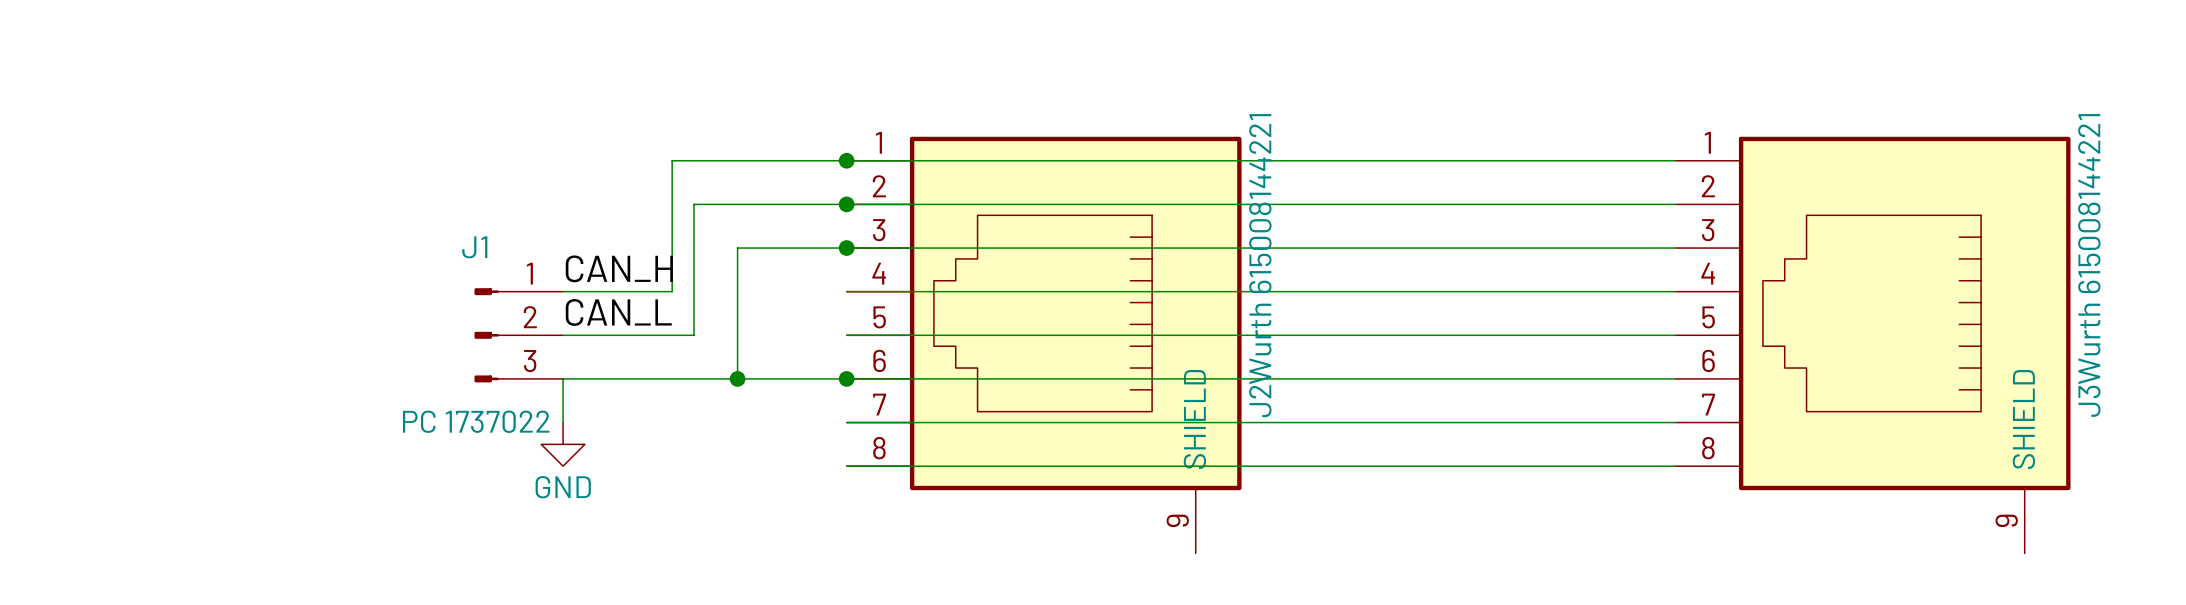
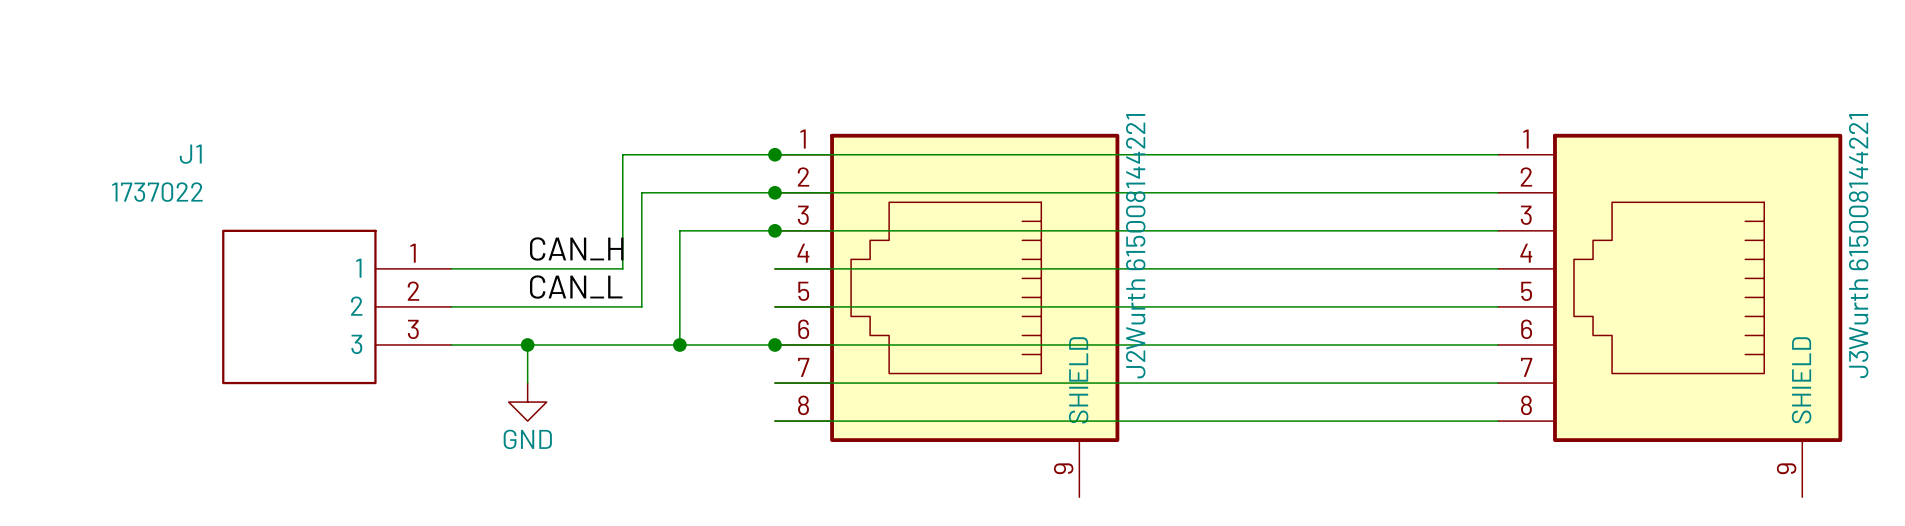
J1 name position: J1 (474, 247) -> J1 (190, 154)
J1 symbol: [474, 288, 564, 383] -> [222, 229, 452, 385]
junction: none -> (527, 344)
J1 value: PC 1737022 (476, 421) -> 1737022 (157, 192)

